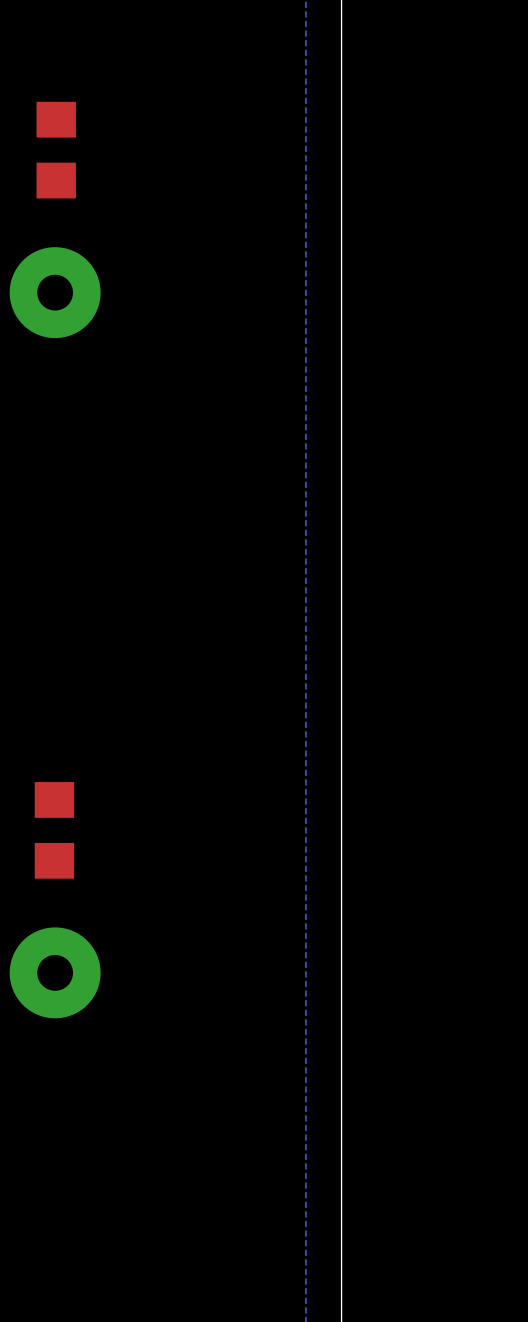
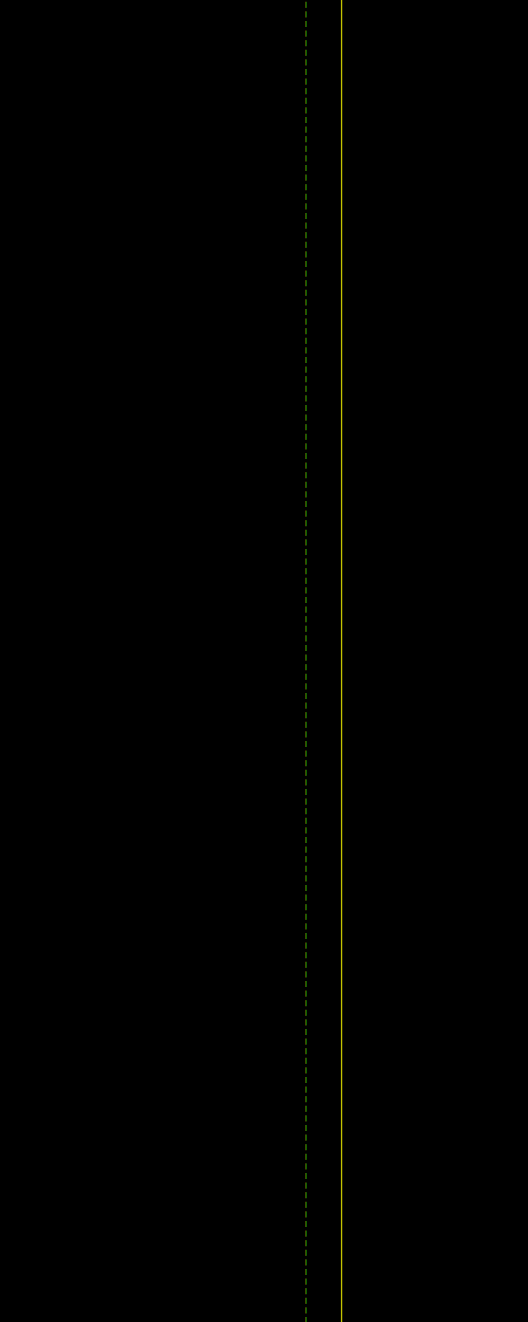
part: (56, 150) -> none
via: (55, 292) -> none
part: (54, 830) -> none
via: (55, 972) -> none

